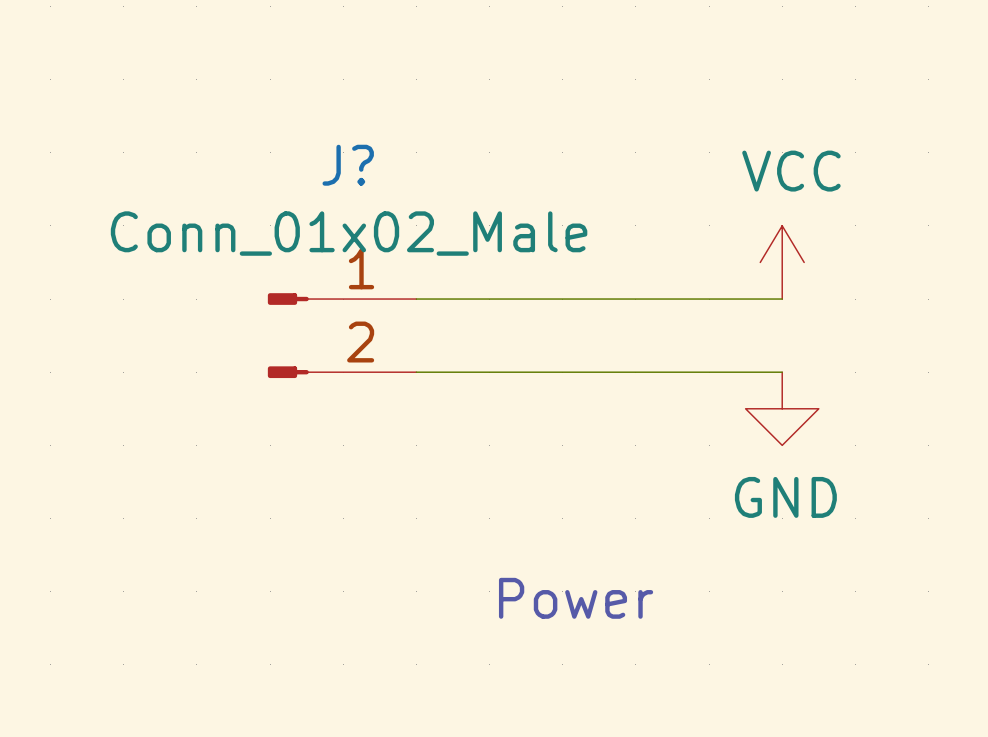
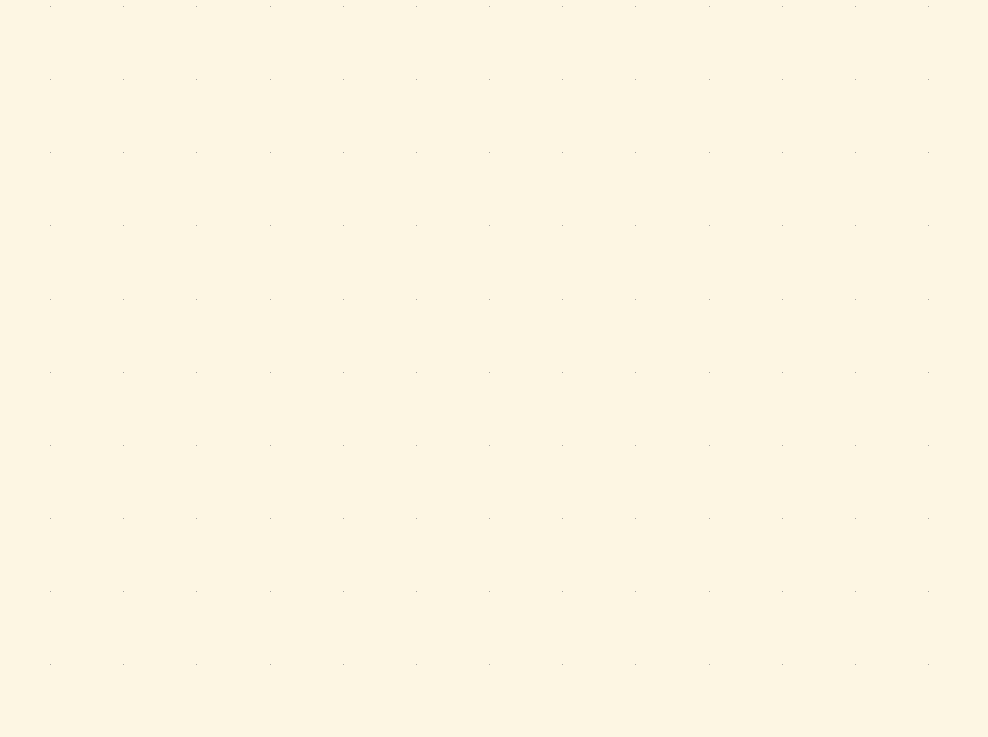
power symbol: VCC (782, 262) -> none
wire: (416, 299) (782, 299) -> none
J?: Conn_01x02_Male (342, 335) -> none
wire: (416, 372) (782, 372) -> none
power symbol: GND (782, 408) -> none
text: Power (576, 598) -> none

